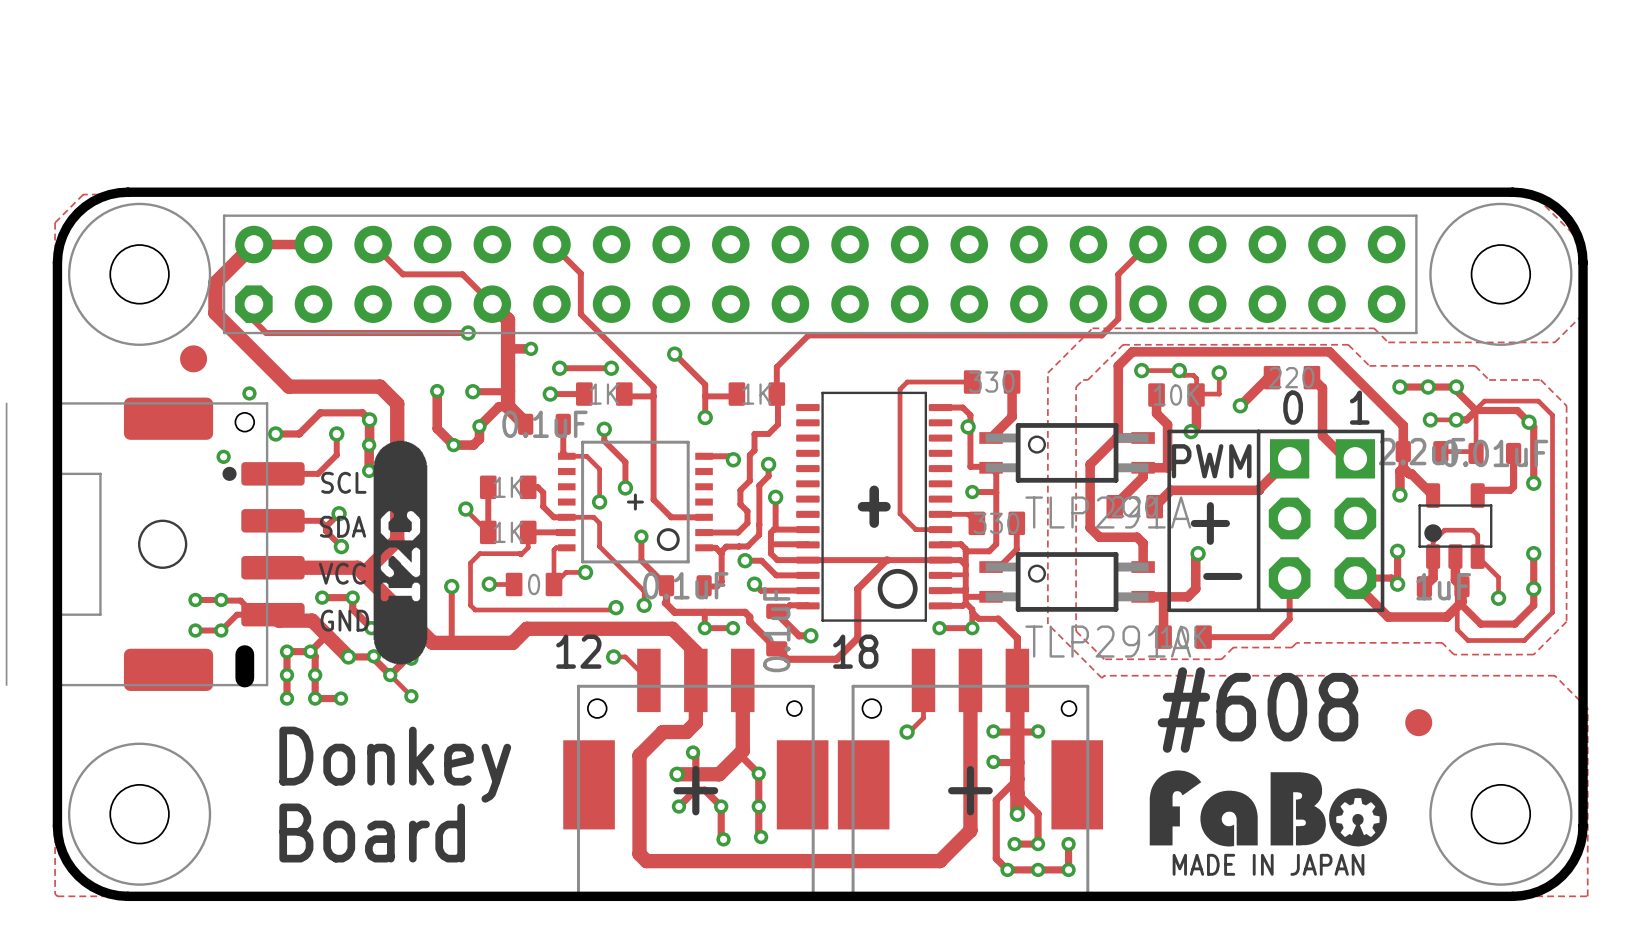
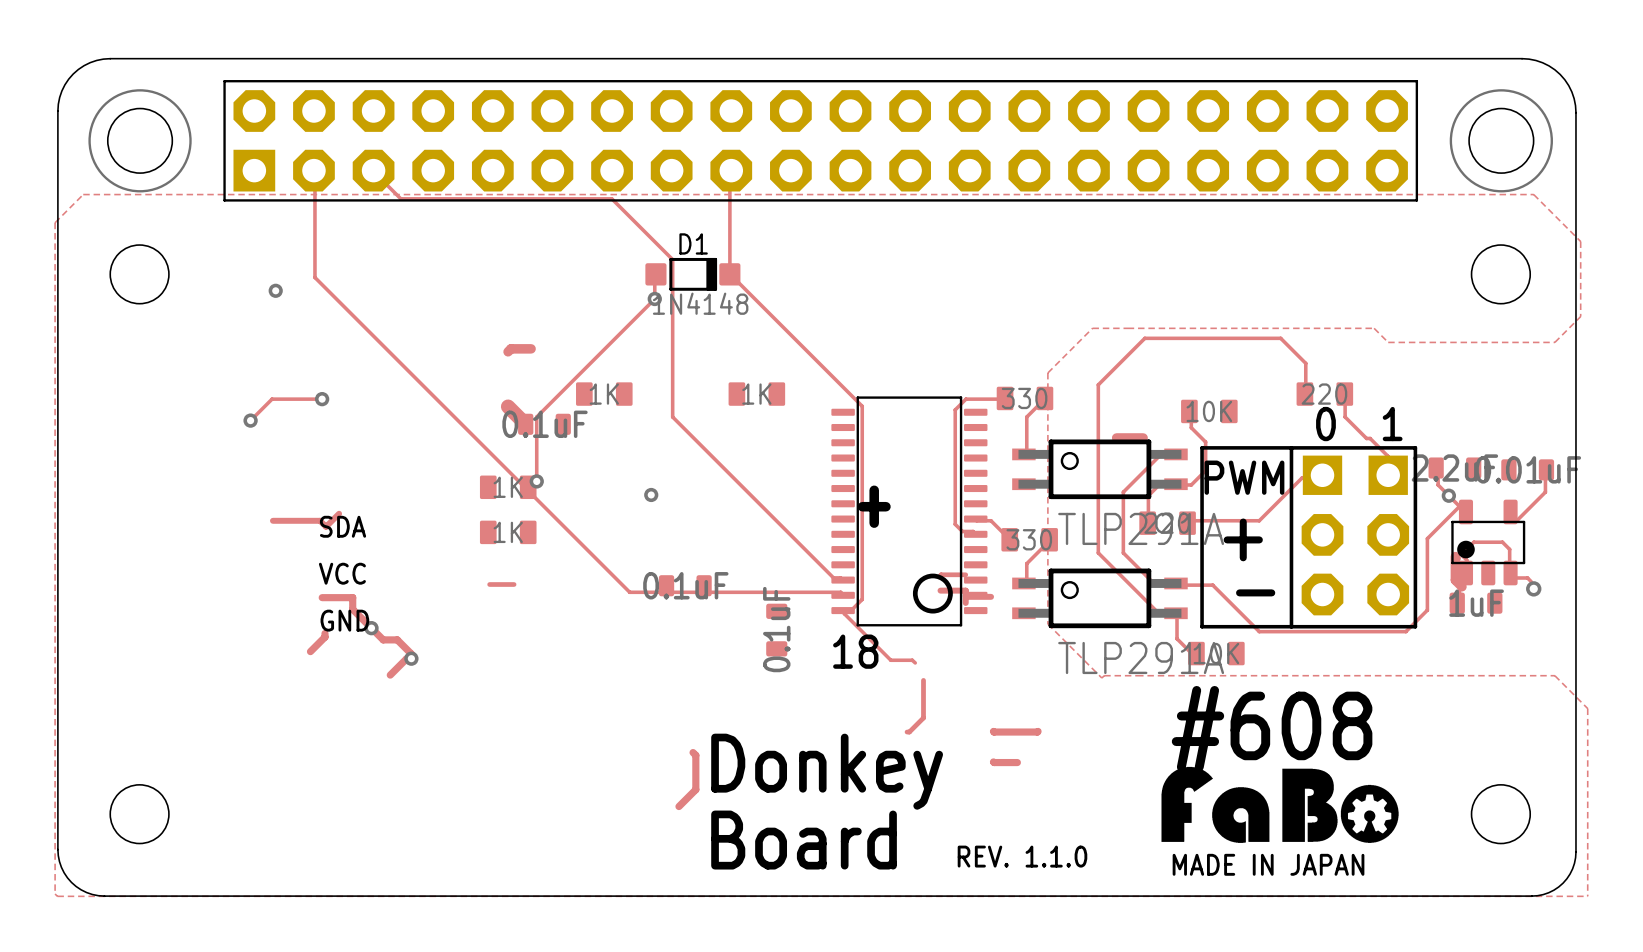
track: none -> (313, 170) (314, 277) (629, 592) (840, 592) (843, 595)
track: none -> (373, 170) (400, 198) (611, 198) (672, 259) (672, 417) (833, 577) (840, 577) (843, 580)
track: none -> (731, 170) (729, 273) (862, 406) (862, 599) (851, 610) (843, 610) (890, 660) (912, 660) (915, 662)
board edge: (127, 192) (1512, 192) (1539, 197) (1555, 206) (1568, 219) (1580, 244) (1583, 262) (1583, 825) (1577, 852) (1568, 868) (1555, 881) (1530, 893) (1512, 896) (127, 896) (100, 890) (84, 881) (71, 868) (62, 852) (58, 835) (57, 262) (62, 235) (78, 212) (100, 197) (127, 192) -> none
drawing: [67, 202, 212, 373] -> none
drawing: [1429, 202, 1573, 346] -> none
track: (313, 244) (253, 244) (215, 283) (215, 313) (288, 386) (380, 386) (397, 403) (397, 540) (363, 573) -> none
track: (373, 244) (402, 274) (462, 274) (493, 305) -> none
track: (551, 244) (580, 273) (580, 314) (653, 387) (653, 499) (671, 517) (704, 517) -> none
track: (1148, 244) (1118, 274) (1118, 318) (1101, 335) (808, 335) (776, 367) (777, 424) (768, 433) (754, 433) (754, 450) (749, 455) (749, 480) (740, 490) (740, 504) (747, 511) (747, 523) (738, 532) (704, 532) -> none
track: none -> (655, 274) (654, 298) (536, 417) (536, 481)
D1: none -> 1N4148 (692, 274)
part: (820, 274) -> none
via: none -> (275, 290)
via: none -> (654, 298)
track: (253, 304) (253, 320) (266, 333) (468, 333) -> none
track: (492, 304) (508, 319) (508, 406) (499, 406) (479, 426) (479, 439) (473, 445) (453, 445) (437, 428) (437, 391) -> none
via: (468, 333) -> none
zone outline: (1123, 344) (1087, 379) (1083, 379) (1076, 387) (1076, 631) (1104, 659) (1221, 659) (1233, 647) (1291, 647) (1296, 642) (1442, 642) (1453, 654) (1533, 654) (1566, 621) (1566, 405) (1540, 379) (1489, 379) (1475, 365) (1369, 365) (1348, 344) (1123, 344) -> none
via: (531, 348) -> none
track: (674, 354) (705, 384) (705, 417) -> none
via: (674, 354) -> none
track: (559, 368) (611, 368) -> none
via: (559, 368) -> none
via: (611, 368) -> none
track: (1141, 370) (1179, 370) (1184, 375) (1193, 375) (1196, 378) (1196, 394) -> none
via: (1141, 370) -> none
via: (1179, 370) -> none
track: (1219, 372) (1219, 394) (1196, 395) -> none
via: (1219, 372) -> none
track: (1272, 377) (1268, 377) (1240, 405) -> none
part position: (1291, 377) -> (1324, 394)
track: (1311, 377) (1322, 388) (1322, 435) (1345, 458) (1355, 458) -> none
track: (972, 382) (907, 382) (900, 389) (900, 513) (915, 529) (940, 529) -> none
part position: (992, 382) -> (1024, 398)
track: (1012, 382) (1012, 416) (991, 437) -> none
track: (1399, 387) (1456, 387) (1456, 390) (1476, 410) -> none
via: (1399, 387) -> none
via: (1428, 387) -> none
via: (1456, 387) -> none
via: (437, 391) -> none
track: (472, 391) (508, 391) -> none
via: (472, 391) -> none
via: (249, 393) -> none
track: (550, 394) (584, 394) -> none
via: (550, 394) -> none
track: (624, 394) (626, 396) (653, 396) -> none
track: (736, 394) (734, 396) (705, 396) -> none
track: none -> (1304, 394) (1305, 363) (1280, 338) (1144, 338) (1098, 384) (1098, 552) (1159, 613) (1177, 613) (1177, 638) (1194, 656) (1196, 653)
track: none -> (1344, 394) (1345, 417) (1388, 456) (1388, 475)
track: (1156, 395) (1156, 413) (1167, 424) (1167, 467) (1143, 467) (1143, 477) (1114, 506) -> none
part position: (1176, 395) -> (1209, 411)
track: (1196, 395) (1196, 426) (1191, 431) -> none
track: none -> (1005, 398) (965, 399) (955, 409) (955, 524) (962, 531) (973, 531) (975, 534)
track: none -> (1044, 398) (1026, 417) (1026, 452) (1023, 454)
track: none -> (322, 399) (272, 399) (250, 420)
via: none -> (322, 399)
via: (1240, 405) -> none
track: (940, 407) (962, 407) (970, 415) (970, 424) (968, 426) -> none
text position: 0 (1293, 407) -> 0 (1325, 424)
text position: 1 (1359, 407) -> 1 (1392, 424)
track: (1476, 410) (1466, 419) (1430, 419) -> none
track: (1476, 410) (1517, 410) (1533, 426) (1533, 483) -> none
track: none -> (1189, 411) (1191, 413) (1191, 427) (1205, 442) (1205, 470) (1191, 484) (1159, 484) (1148, 495) (1147, 523)
via: (705, 417) -> none
via: (369, 419) -> none
via: (1430, 419) -> none
via: (1456, 419) -> none
via: none -> (250, 420)
via: (1529, 422) -> none
track: (563, 424) (563, 452) (566, 456) (586, 456) (599, 469) (599, 502) -> none
track: (969, 425) (970, 466) (990, 466) (996, 472) (996, 544) (989, 551) (965, 551) -> none
via: (479, 426) -> none
via: (968, 426) -> none
track: (604, 429) (604, 441) (625, 462) (625, 487) -> none
via: (604, 429) -> none
line: (1169, 431) (1169, 610) (1382, 610) (1382, 431) (1169, 431) -> (1202, 447) (1202, 626) (1415, 626) (1415, 447) (1202, 447)
via: (1191, 431) -> none
line: (1258, 431) (1258, 610) -> (1291, 447) (1291, 626)
track: (275, 433) (299, 433) (320, 412) (362, 412) (369, 419) (369, 470) -> none
via: (275, 433) -> none
track: (336, 433) (336, 455) (317, 473) (272, 473) -> none
via: (336, 433) -> none
drawing: [373, 440, 428, 665] -> none
via: (369, 445) -> none
via: (453, 445) -> none
part position: (1422, 451) -> (1454, 468)
track: (1440, 451) (1474, 451) (1476, 453) (1476, 409) (1484, 401) (1538, 401) (1552, 415) (1552, 612) (1524, 640) (1468, 640) (1457, 629) (1457, 591) (1461, 586) -> none
part position: (1067, 452) -> (1099, 469)
part position: (1494, 453) -> (1527, 469)
track: (1513, 453) (1513, 486) (1510, 490) (1482, 490) (1477, 495) -> none
track: none -> (1175, 454) (1162, 452) (1123, 492) (1123, 552) (1155, 585) (1175, 583) (1177, 585) (1212, 585) (1259, 631) (1405, 631) (1427, 610) (1427, 538) (1459, 506) (1465, 511) (1438, 484) (1438, 470) (1436, 468)
via: (223, 456) -> none
track: (704, 456) (729, 456) (733, 459) -> none
track: (1289, 458) (1259, 490) (1171, 490) (1154, 506) -> none
via: (733, 459) -> none
text position: PWM (1211, 461) -> PWM (1244, 477)
track: (768, 464) (768, 476) (759, 485) (759, 524) -> none
via: (768, 464) -> none
track: (1403, 467) (1433, 495) -> none
track: (1403, 467) (1403, 425) (1329, 351) (1132, 351) (1118, 365) (1118, 436) (1090, 464) (1090, 527) (1099, 537) (1137, 537) (1143, 543) (1143, 567) -> none
track: (1403, 467) (1399, 471) (1399, 494) -> none
track: none -> (1546, 469) (1545, 492) (1516, 520) (1509, 513) (1510, 511)
via: (369, 470) -> none
track: none -> (1322, 475) (1320, 477) (1302, 477) (1259, 520) (1187, 520) (1187, 523)
part: none -> (816, 477)
via: none -> (536, 481)
text: SCL (343, 482) -> none
via: (1533, 483) -> none
track: (488, 487) (488, 532) (465, 509) -> none
track: (528, 487) (537, 487) (543, 492) (543, 506) (553, 517) (593, 517) (599, 523) (599, 546) (644, 591) (644, 605) -> none
via: (625, 487) -> none
track: (972, 492) (996, 492) -> none
via: (972, 492) -> none
via: (1399, 494) -> none
via: none -> (1448, 495)
track: (775, 497) (775, 527) (770, 532) (770, 553) (777, 560) (960, 560) (965, 565) -> none
via: (775, 497) -> none
via: (599, 502) -> none
part: (635, 502) -> none
part position: (874, 506) -> (909, 511)
part position: (1134, 506) -> (1167, 523)
via: (465, 509) -> none
via: (339, 513) -> none
track: (940, 514) (967, 514) (976, 523) -> none
track: none -> (975, 519) (976, 520) (991, 520) (1009, 539)
part: (1289, 519) -> none
part: (1355, 519) -> none
part position: (996, 523) -> (1029, 539)
track: (1016, 523) (1016, 549) (999, 567) (991, 567) -> none
text position: + (1210, 523) -> + (1243, 539)
track: (759, 524) (759, 534) (747, 546) (739, 546) -> none
track: (326, 526) (326, 531) (341, 546) -> none
part position: (1455, 526) -> (1488, 542)
track: (773, 529) (807, 529) -> none
track: (557, 532) (528, 532) (528, 547) (520, 554) (479, 553) (470, 563) (470, 605) (475, 609) (613, 609) (616, 607) -> none
part: none -> (1322, 535)
part: none -> (1388, 535)
track: (641, 536) (641, 560) (666, 585) (665, 602) (674, 612) (745, 612) (749, 617) (749, 621) (787, 659) (836, 659) (857, 638) (857, 588) (888, 560) -> none
via position: (641, 536) -> (651, 494)
track: none -> (1049, 539) (1026, 563) (1026, 581) (1023, 583)
part: (155, 544) -> none
track: (770, 544) (807, 544) -> none
track: (940, 544) (961, 544) (965, 548) (965, 588) (963, 590) -> none
via: (341, 546) -> none
track: (739, 546) (726, 546) (720, 552) -> none
track: (566, 547) (556, 547) (554, 549) (554, 584) (566, 572) (585, 572) -> none
track: (704, 547) (715, 547) (721, 553) (721, 581) (716, 586) (704, 585) -> none
track: (1397, 551) (1397, 584) (1391, 578) (1355, 578) (1355, 584) (1388, 617) (1446, 617) (1461, 601) (1461, 586) -> none
via: (1397, 551) -> none
track: (1198, 553) (1195, 556) (1195, 588) (1187, 596) (1143, 596) -> none
via: (1198, 553) -> none
track: (1533, 553) (1533, 605) (1514, 624) (1480, 624) (1461, 605) (1461, 586) -> none
via: (1533, 553) -> none
track: (745, 560) (761, 560) (776, 575) (807, 575) -> none
via: (745, 560) -> none
track: (272, 567) (357, 567) (432, 642) (512, 642) (526, 628) (672, 628) (695, 652) (695, 722) (686, 732) (662, 732) (639, 755) (639, 854) (646, 861) (939, 861) (970, 830) (970, 680) -> none
via: (585, 572) -> none
text position: _ (1222, 576) -> _ (1255, 592)
track: (1289, 578) (1289, 619) (1271, 637) (1203, 637) -> none
part position: (1067, 581) -> (1099, 598)
track: none -> (1531, 581) (1527, 577) (1513, 577) (1509, 574) (1509, 549) (1502, 542) (1473, 542) (1463, 552) (1463, 556) (1466, 560) (1466, 570) (1463, 574) (1463, 585) (1459, 588) (1459, 603) (1457, 603)
via: (489, 584) -> none
part: 0 (534, 584) -> none
track: (754, 584) (760, 590) (807, 590) -> none
via: (754, 584) -> none
via: (1397, 584) -> none
track: (451, 586) (451, 642) -> none
via: (451, 586) -> none
track: (1424, 586) (1433, 578) (1433, 541) (1444, 530) (1472, 530) (1477, 535) (1477, 556) (1498, 577) (1498, 598) -> none
part position: (1443, 586) -> (1476, 603)
track: (1162, 596) (1163, 637) -> none
via: (322, 597) -> none
via: (352, 597) -> none
via: (1498, 598) -> none
track: (195, 599) (240, 600) (254, 614) -> none
via: (195, 599) -> none
via: (221, 599) -> none
via: (644, 605) -> none
track: (807, 605) (789, 605) (783, 611) (776, 611) (776, 613) (799, 635) (810, 635) -> none
track: (940, 605) (962, 605) (965, 602) (972, 609) (972, 628) (939, 628) -> none
via: (616, 607) -> none
track: (705, 612) (704, 628) (732, 628) -> none
track: (972, 612) (978, 618) (998, 618) (1017, 638) (1017, 814) -> none
via: (704, 628) -> none
via: (732, 628) -> none
via: (939, 628) -> none
via: (972, 628) -> none
track: (195, 630) (221, 630) (237, 614) (272, 614) (278, 620) (312, 620) (348, 656) (373, 656) (373, 658) (411, 696) -> none
via: (195, 630) -> none
via: (221, 630) -> none
via: (810, 635) -> none
part position: (1183, 637) -> (1216, 653)
via: (287, 651) -> none
via: (310, 651) -> none
text: 12 (578, 651) -> none
via: (348, 656) -> none
via: (373, 656) -> none
track: (613, 656) (625, 656) (648, 680) -> none
via: (613, 656) -> none
via: (287, 675) -> none
via: (315, 675) -> none
via: (390, 675) -> none
track: (742, 680) (742, 750) -> none
via: (411, 696) -> none
track: (287, 698) (287, 651) (310, 651) (315, 656) (315, 698) (340, 698) -> none
via: (287, 698) -> none
via: (315, 698) -> none
via: (340, 698) -> none
drawing: [1405, 709, 1573, 886] -> none
text position: #608 (1257, 710) -> #608 (1272, 728)
via: (993, 731) -> none
via: (1038, 731) -> none
via: (907, 732) -> none
drawing: [67, 742, 212, 886] -> none
track: (742, 750) (742, 757) (758, 773) (758, 834) (761, 837) -> none
track: (742, 750) (719, 774) (677, 774) -> none
via: (693, 752) -> none
via: (993, 761) -> none
text position: Donkey (395, 764) -> Donkey (827, 771)
part: (695, 772) -> none
part: (970, 772) -> none
via: (758, 773) -> none
via: (677, 774) -> none
track: (1017, 778) (996, 800) (996, 858) (1007, 869) (1068, 869) (1068, 844) -> none
track: (695, 790) (704, 790) (721, 806) (721, 837) (723, 839) -> none
track: (1017, 793) (1038, 813) (1038, 844) (1014, 844) -> none
via: (678, 806) -> none
via: (721, 806) -> none
via: (758, 806) -> none
drawing position: (1268, 808) -> (1280, 804)
via: (1017, 814) -> none
text position: Board (372, 833) -> Board (804, 840)
via: (761, 837) -> none
via: (723, 839) -> none
via: (1014, 844) -> none
via: (1038, 844) -> none
via: (1068, 844) -> none
text: none -> REV. 1.1.0 (1022, 856)
via: (1007, 869) -> none
via: (1038, 869) -> none
via: (1068, 869) -> none

